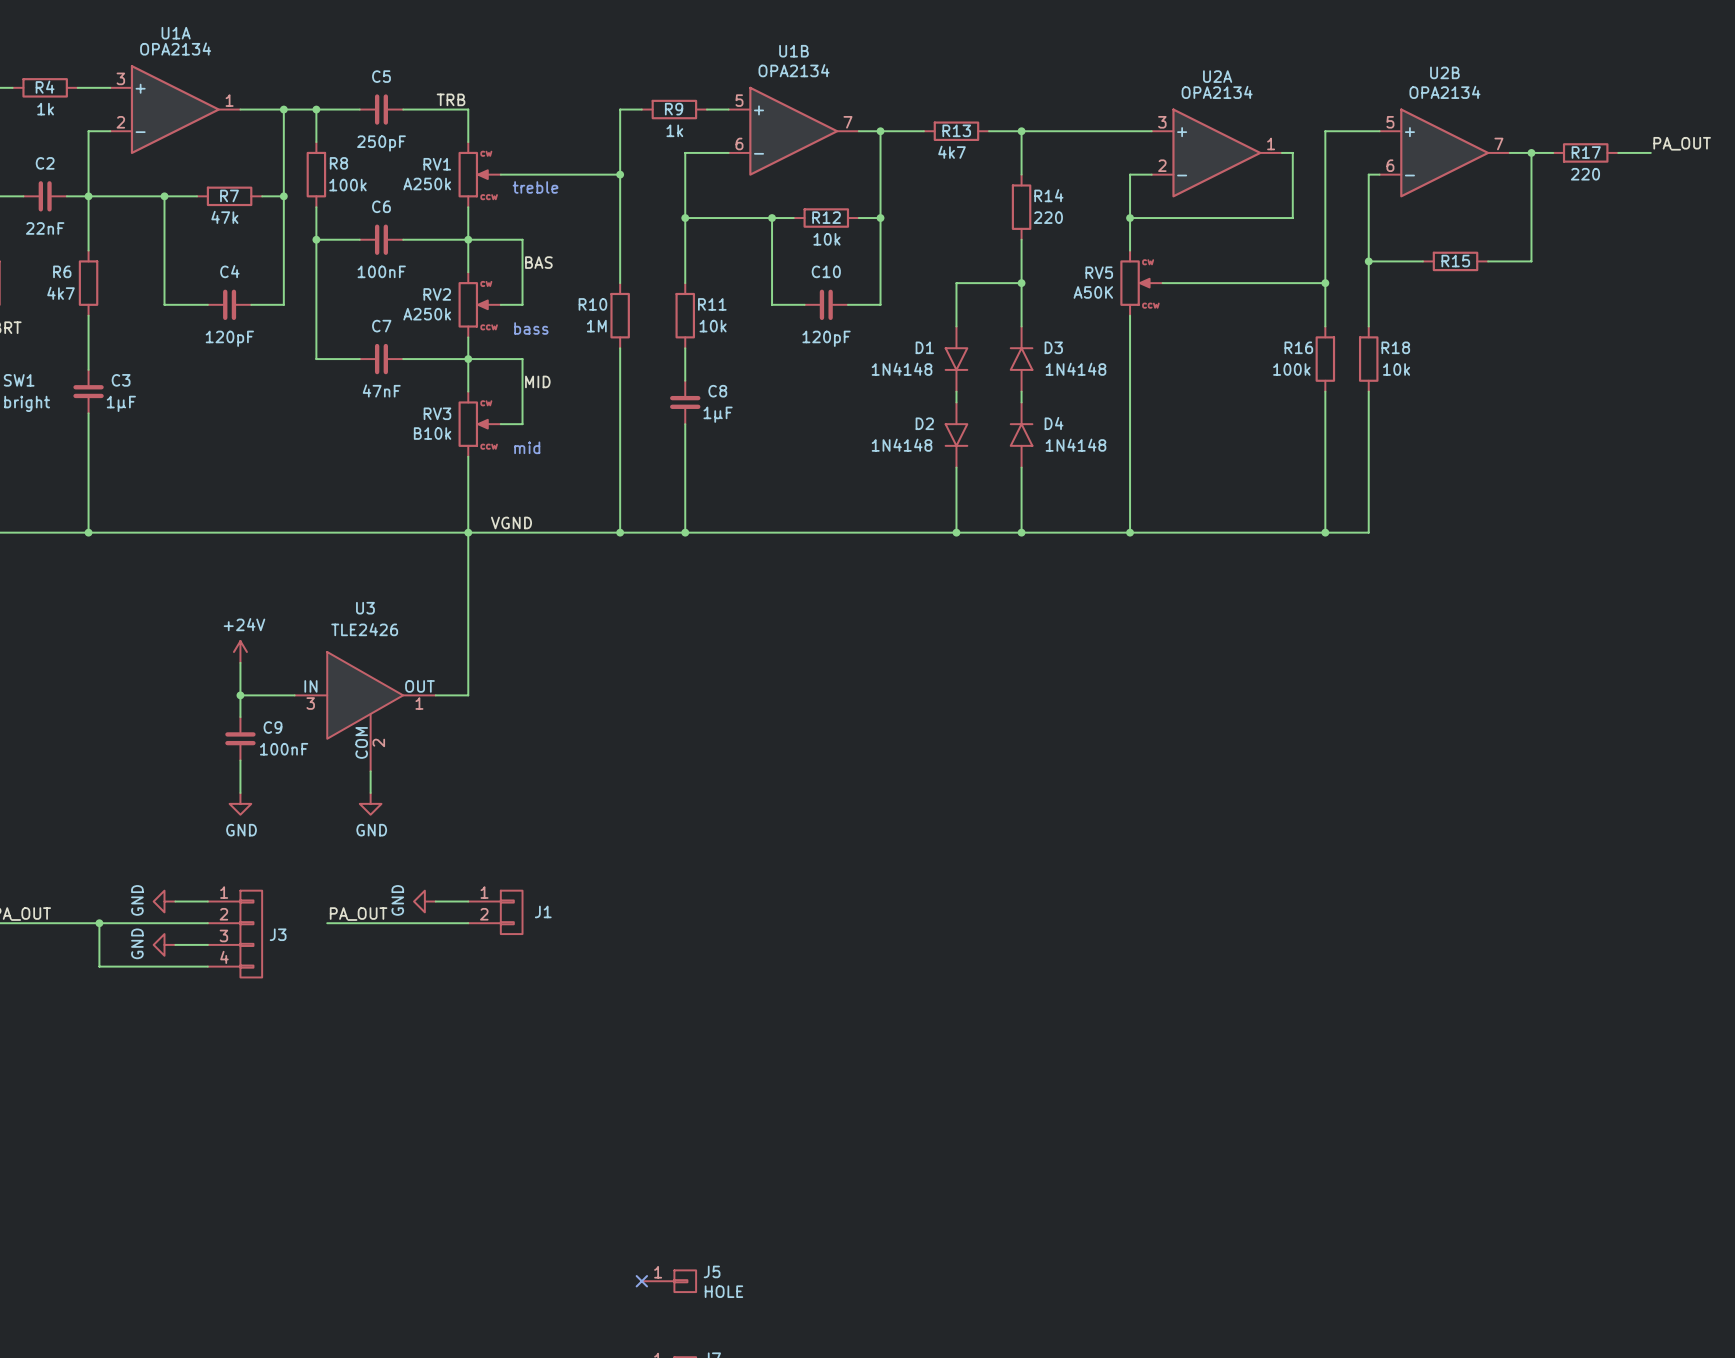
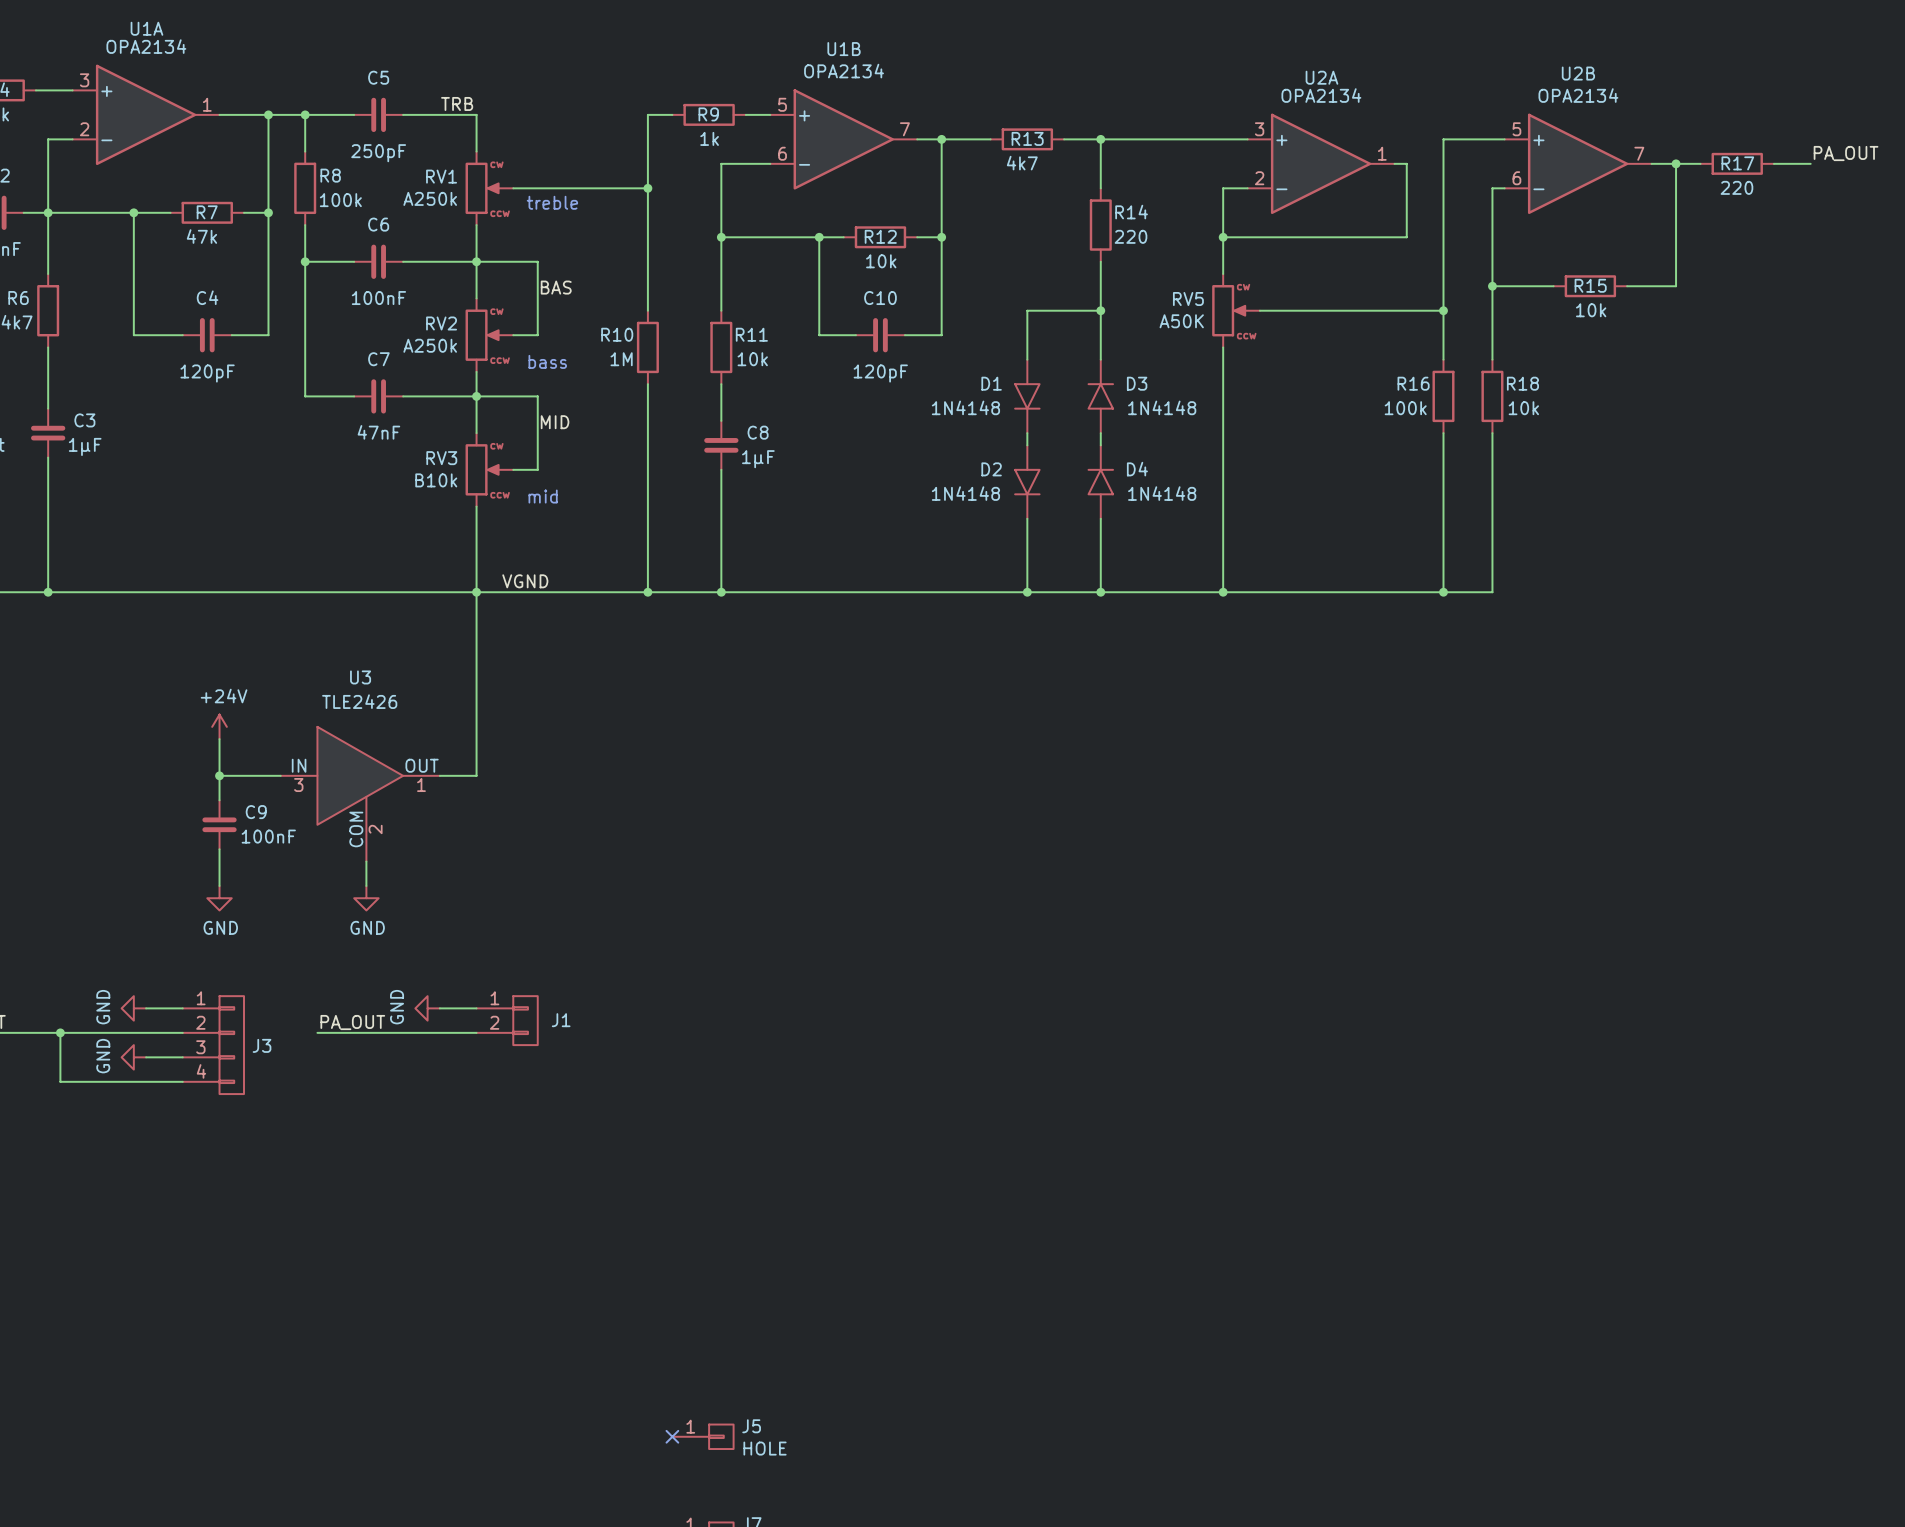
R15 value: none -> 10k (1591, 310)

